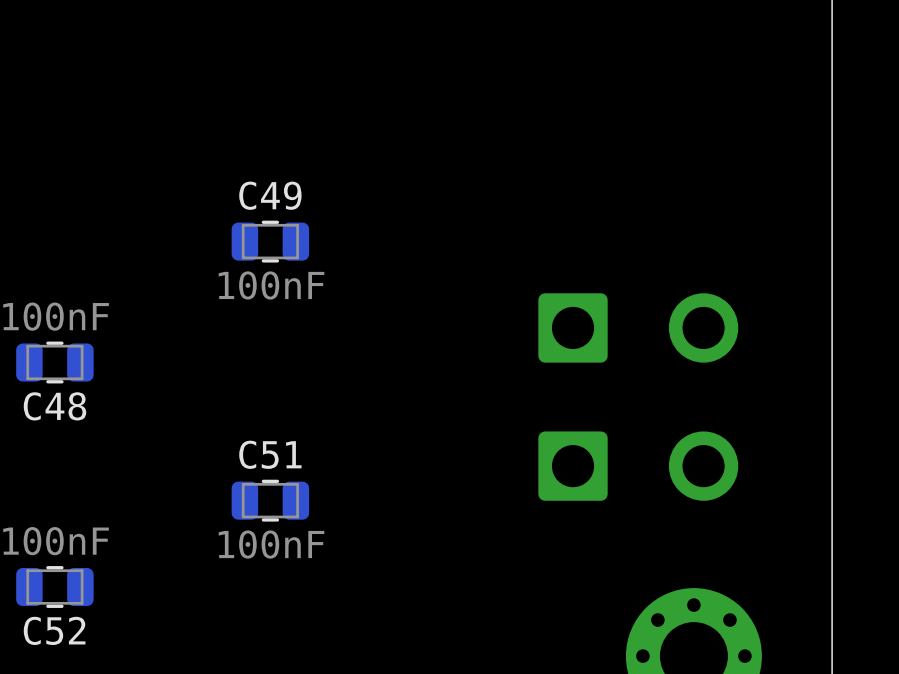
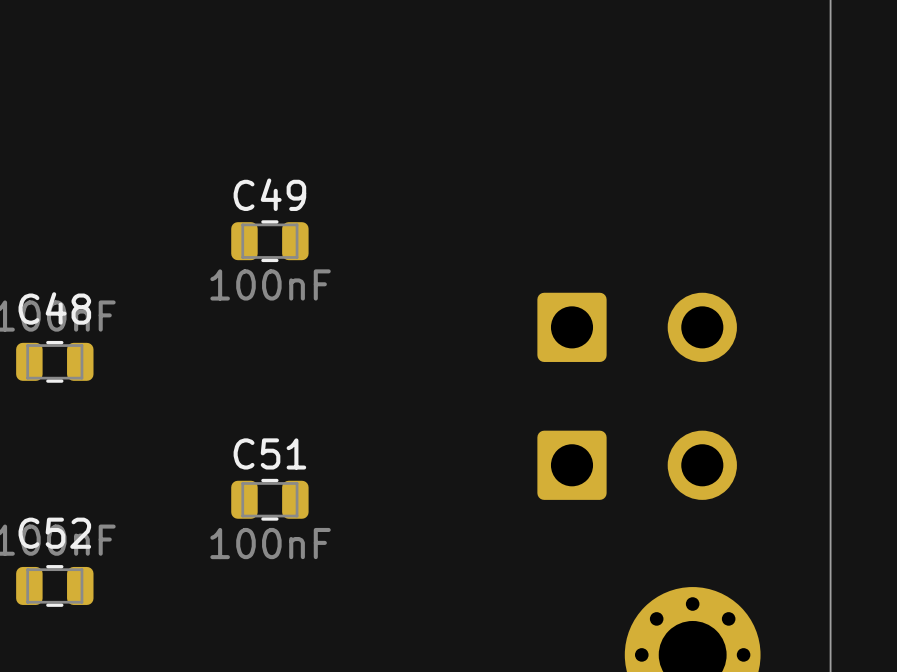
C48 name position: C48 (54, 406) -> C48 (54, 308)
C52 name position: C52 (54, 630) -> C52 (54, 533)

